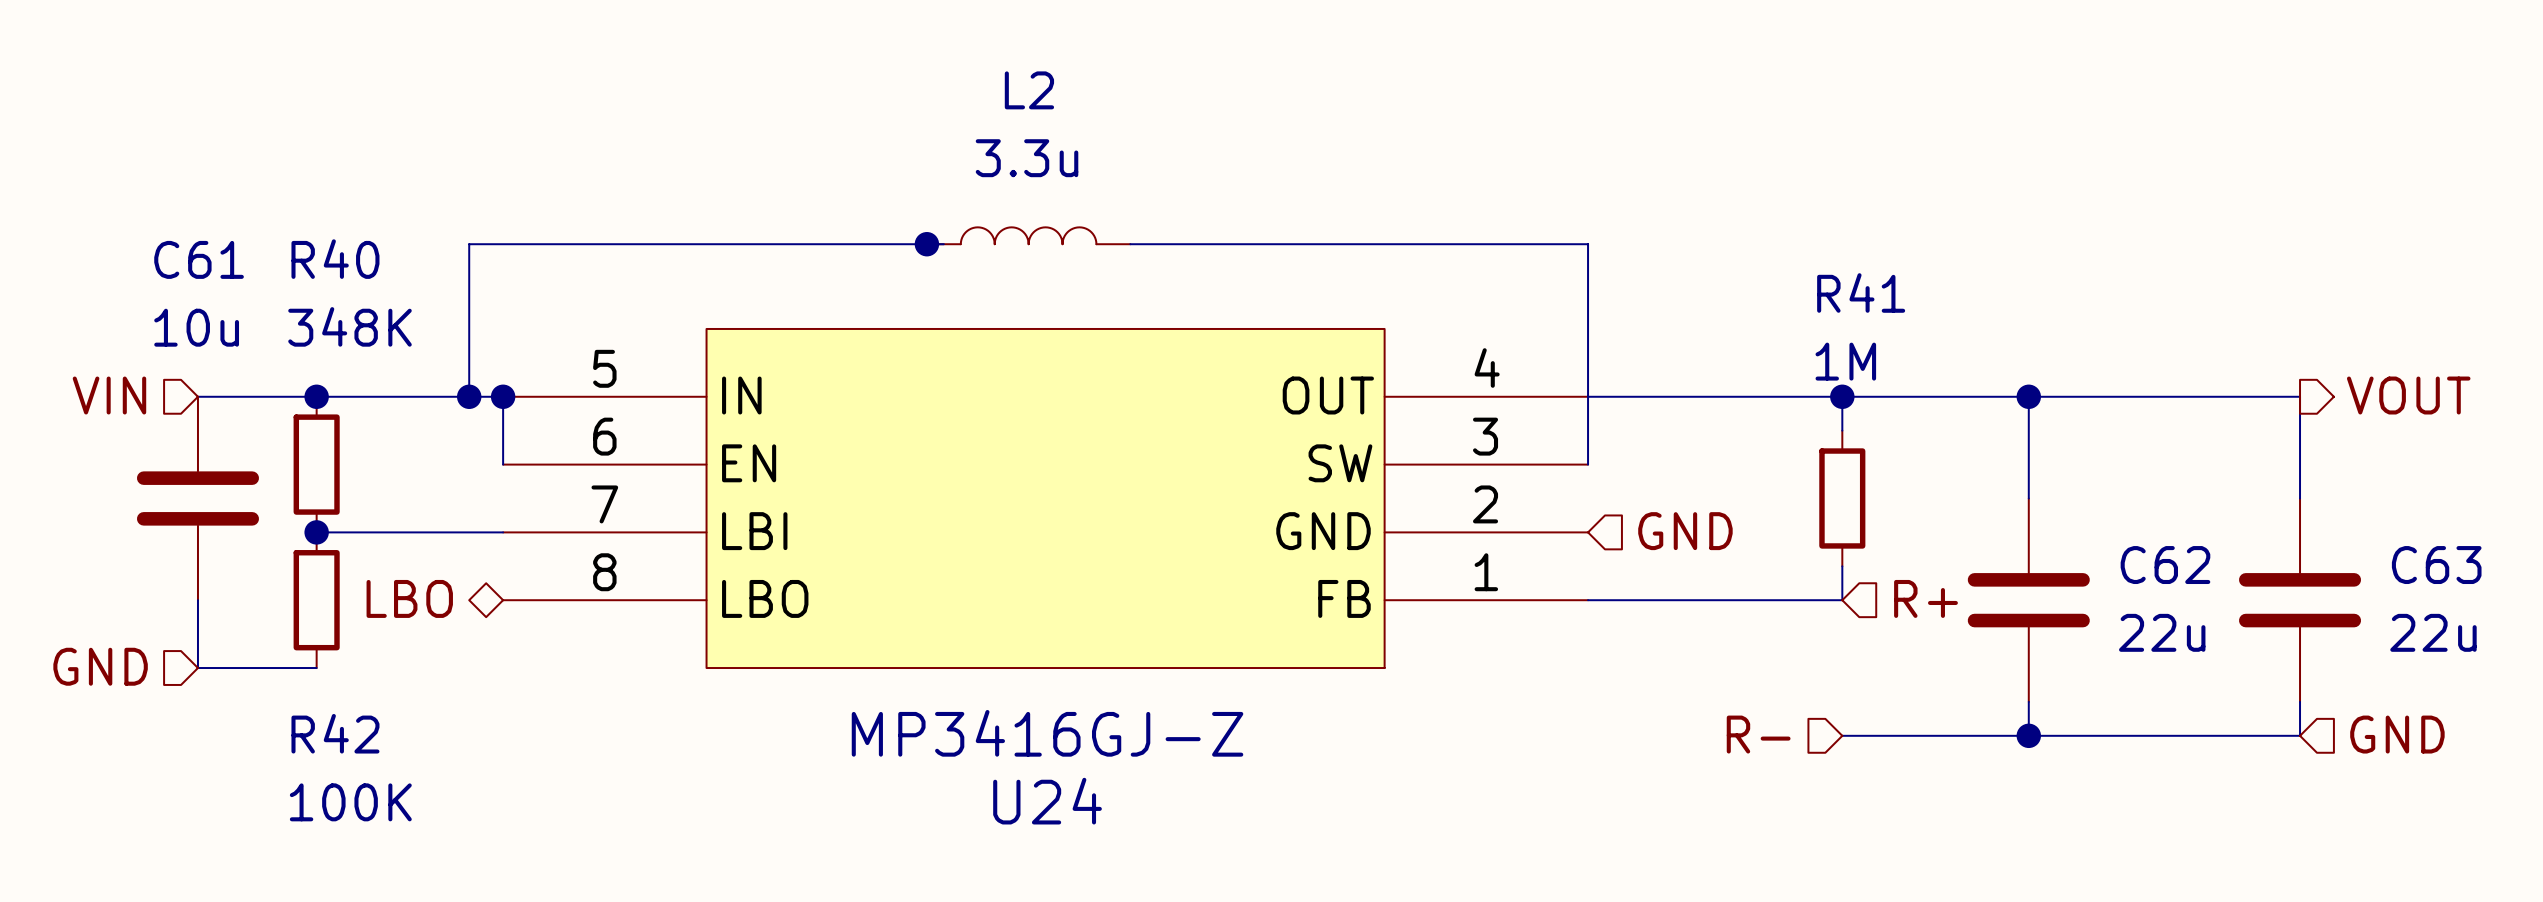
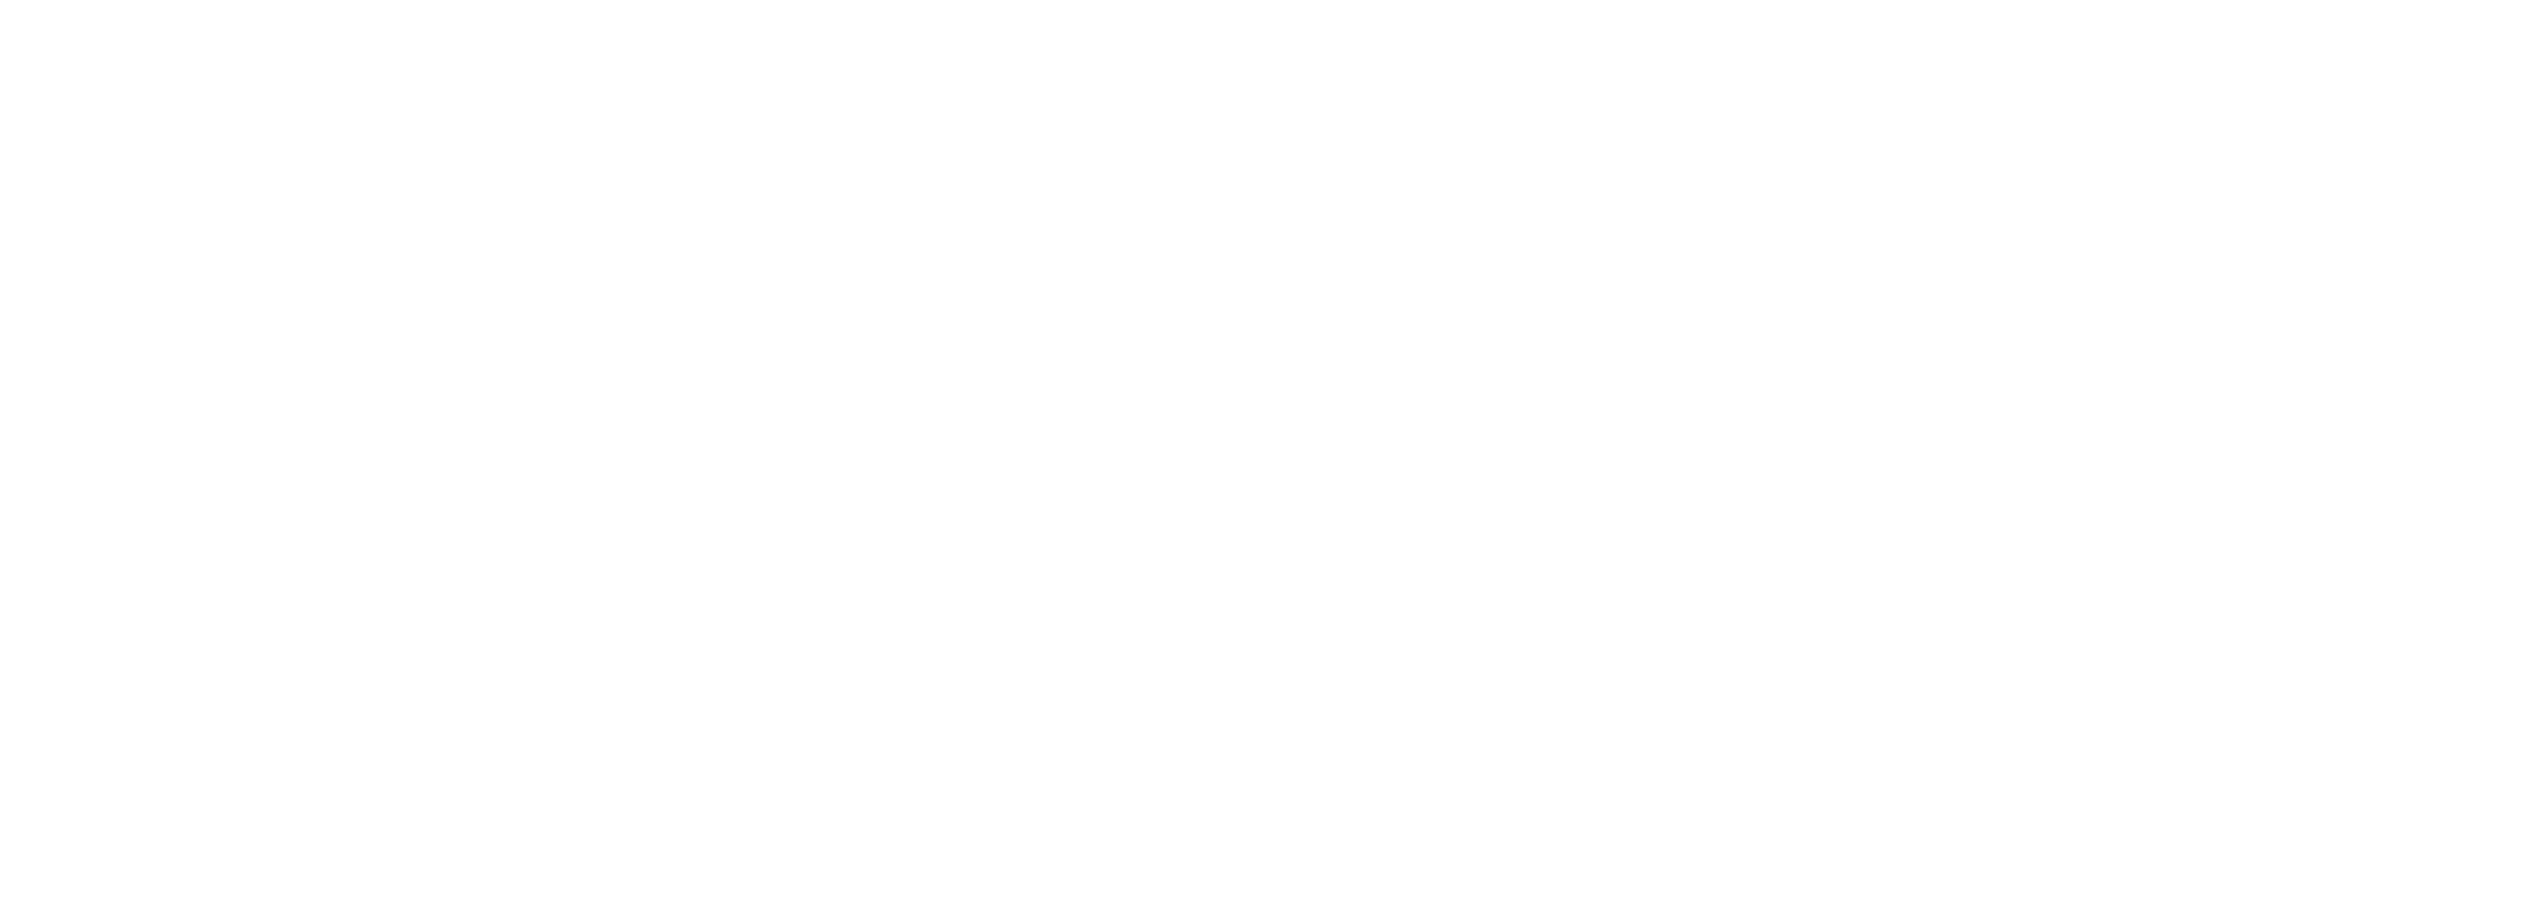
L2: 3.3u (1028, 235) -> none
junction: (926, 244) -> none
wire: (943, 244) (469, 244) (469, 396) -> none
wire: (1130, 244) (1588, 244) (1588, 464) -> none
hierarchical label: VIN (109, 395) -> none
hierarchical label: VOUT (2408, 395) -> none
wire: (197, 396) (503, 396) (503, 464) -> none
junction: (316, 396) -> none
junction: (469, 396) -> none
junction: (503, 396) -> none
wire: (1588, 396) (2300, 396) (2300, 498) -> none
wire: (1842, 396) (1842, 430) -> none
junction: (1842, 396) -> none
wire: (2028, 396) (2028, 498) -> none
junction: (2028, 396) -> none
R40: 348K (316, 464) -> none
C61: 10u (197, 498) -> none
U24: MP3416GJ-Z (1045, 498) -> none
R41: 1M (1842, 498) -> none
hierarchical label: GND (1685, 531) -> none
wire: (316, 532) (503, 532) -> none
junction: (316, 532) -> none
wire: (1842, 566) (1842, 600) (1588, 600) -> none
hierarchical label: LBO (409, 598) -> none
hierarchical label: R+ (1925, 598) -> none
wire: (197, 600) (197, 668) (316, 668) -> none
R42: 100K (316, 600) -> none
C62: 22u (2028, 600) -> none
C63: 22u (2300, 600) -> none
hierarchical label: GND (100, 666) -> none
wire: (2028, 701) (2028, 735) -> none
wire: (2300, 701) (2300, 735) (1842, 735) -> none
hierarchical label: R- (1758, 734) -> none
hierarchical label: GND (2397, 734) -> none
junction: (2028, 735) -> none

